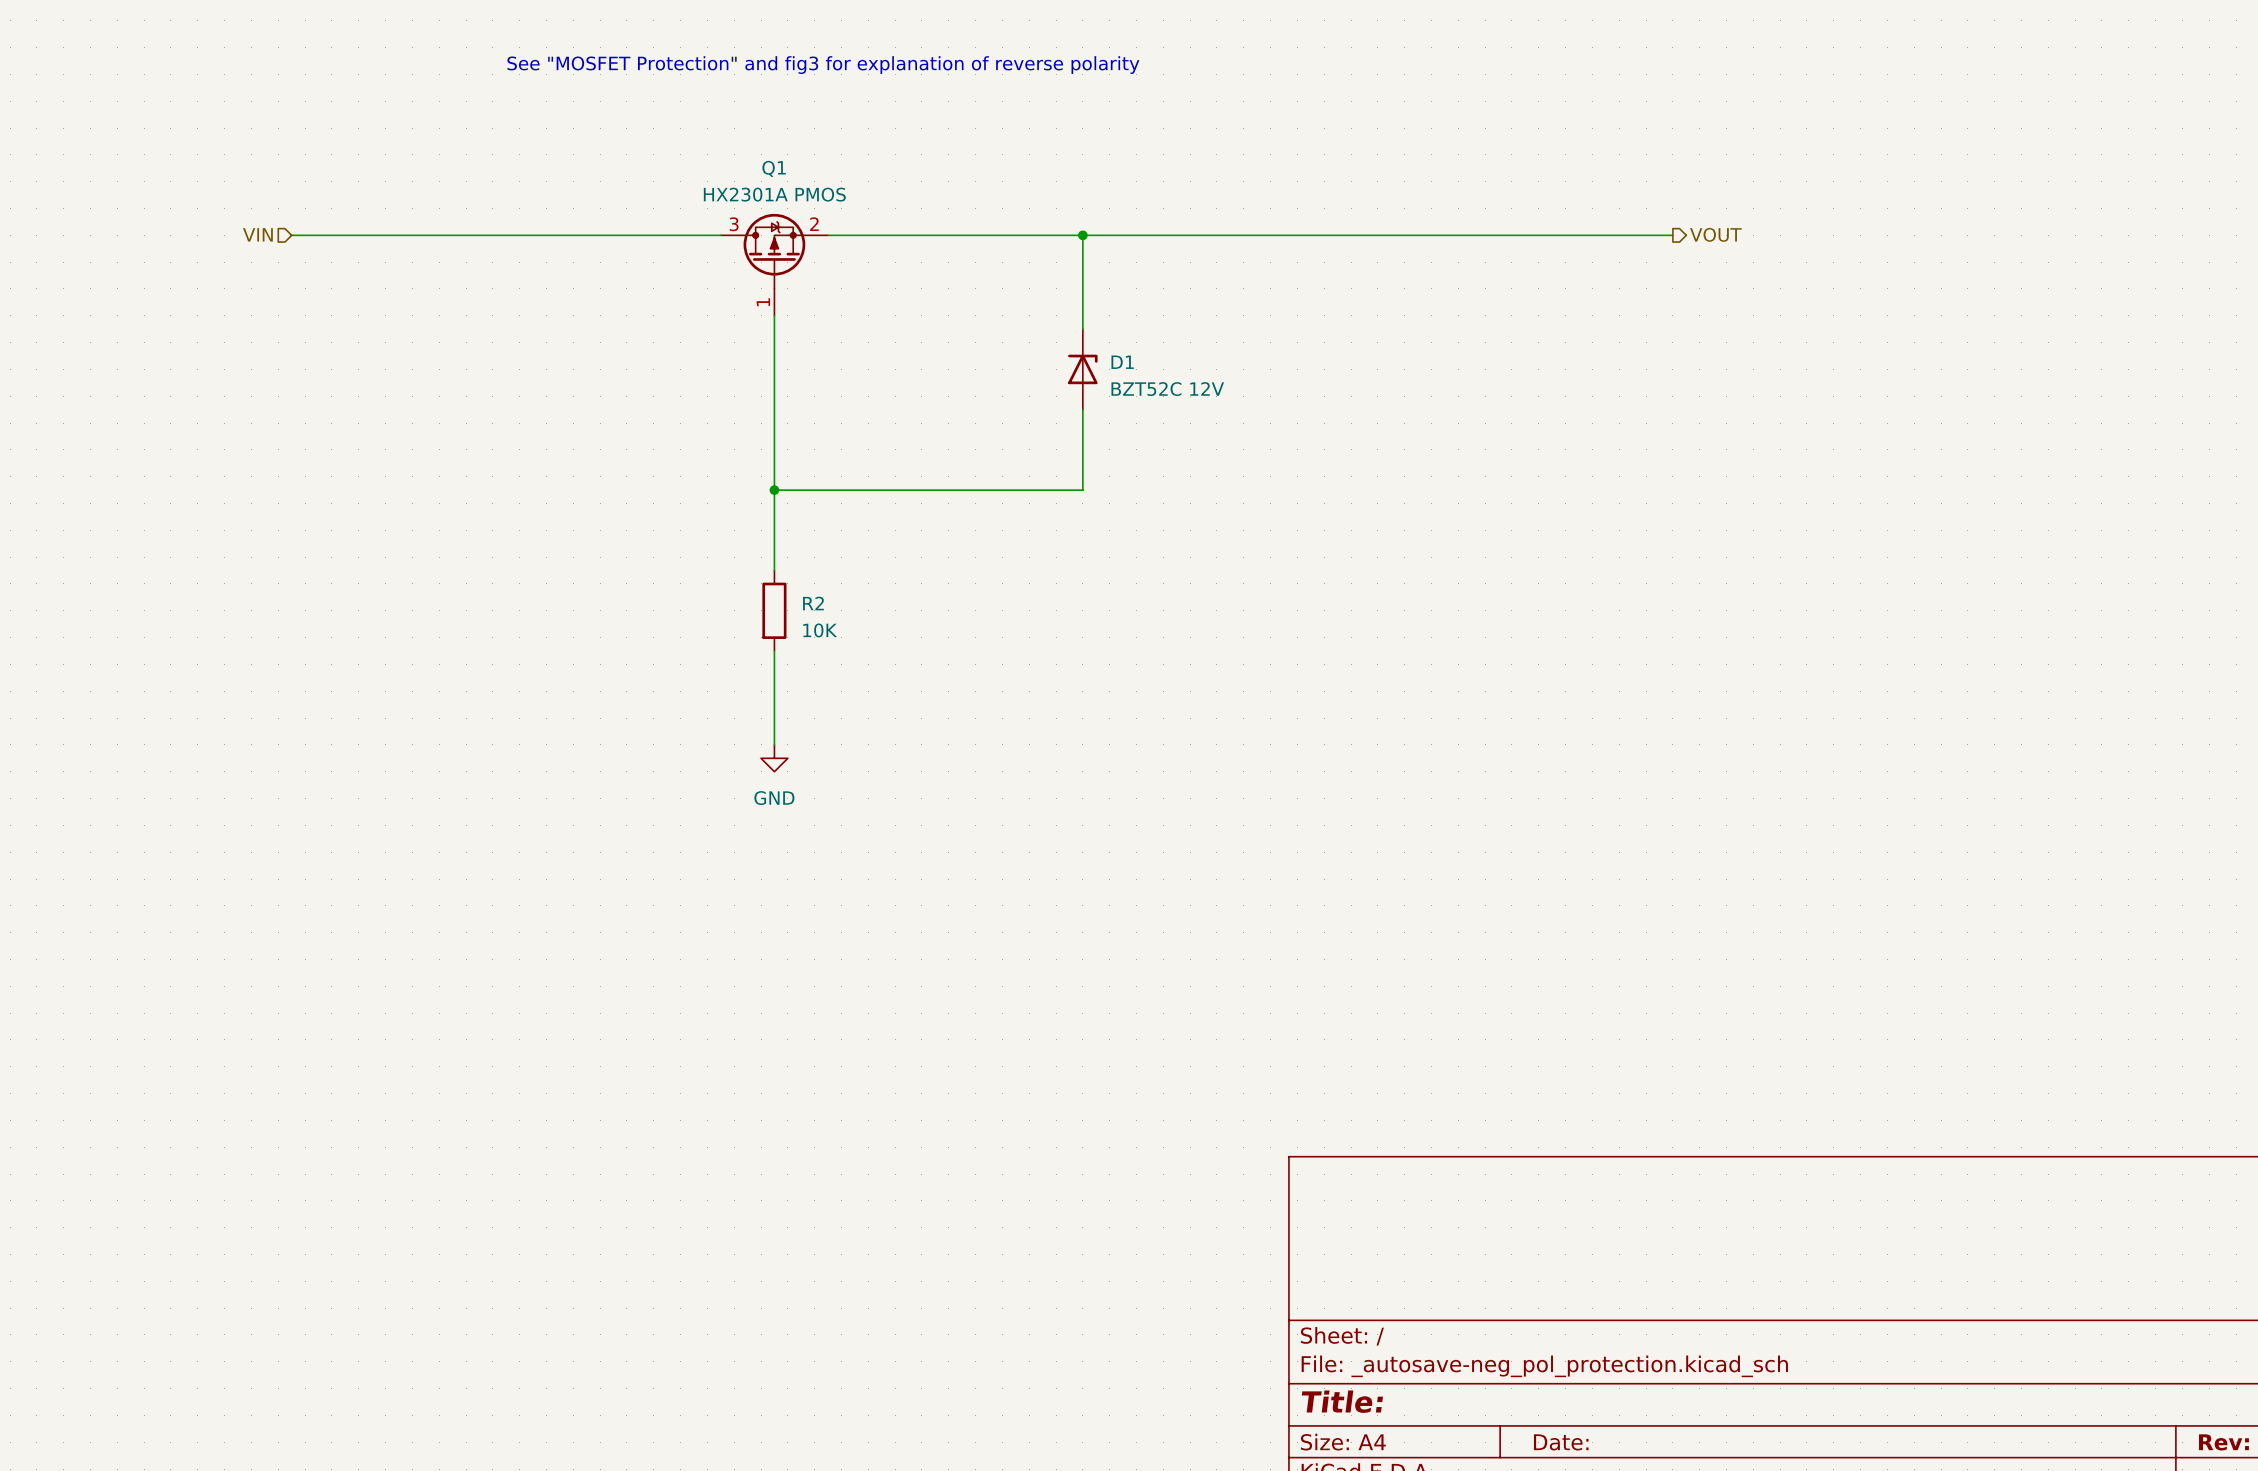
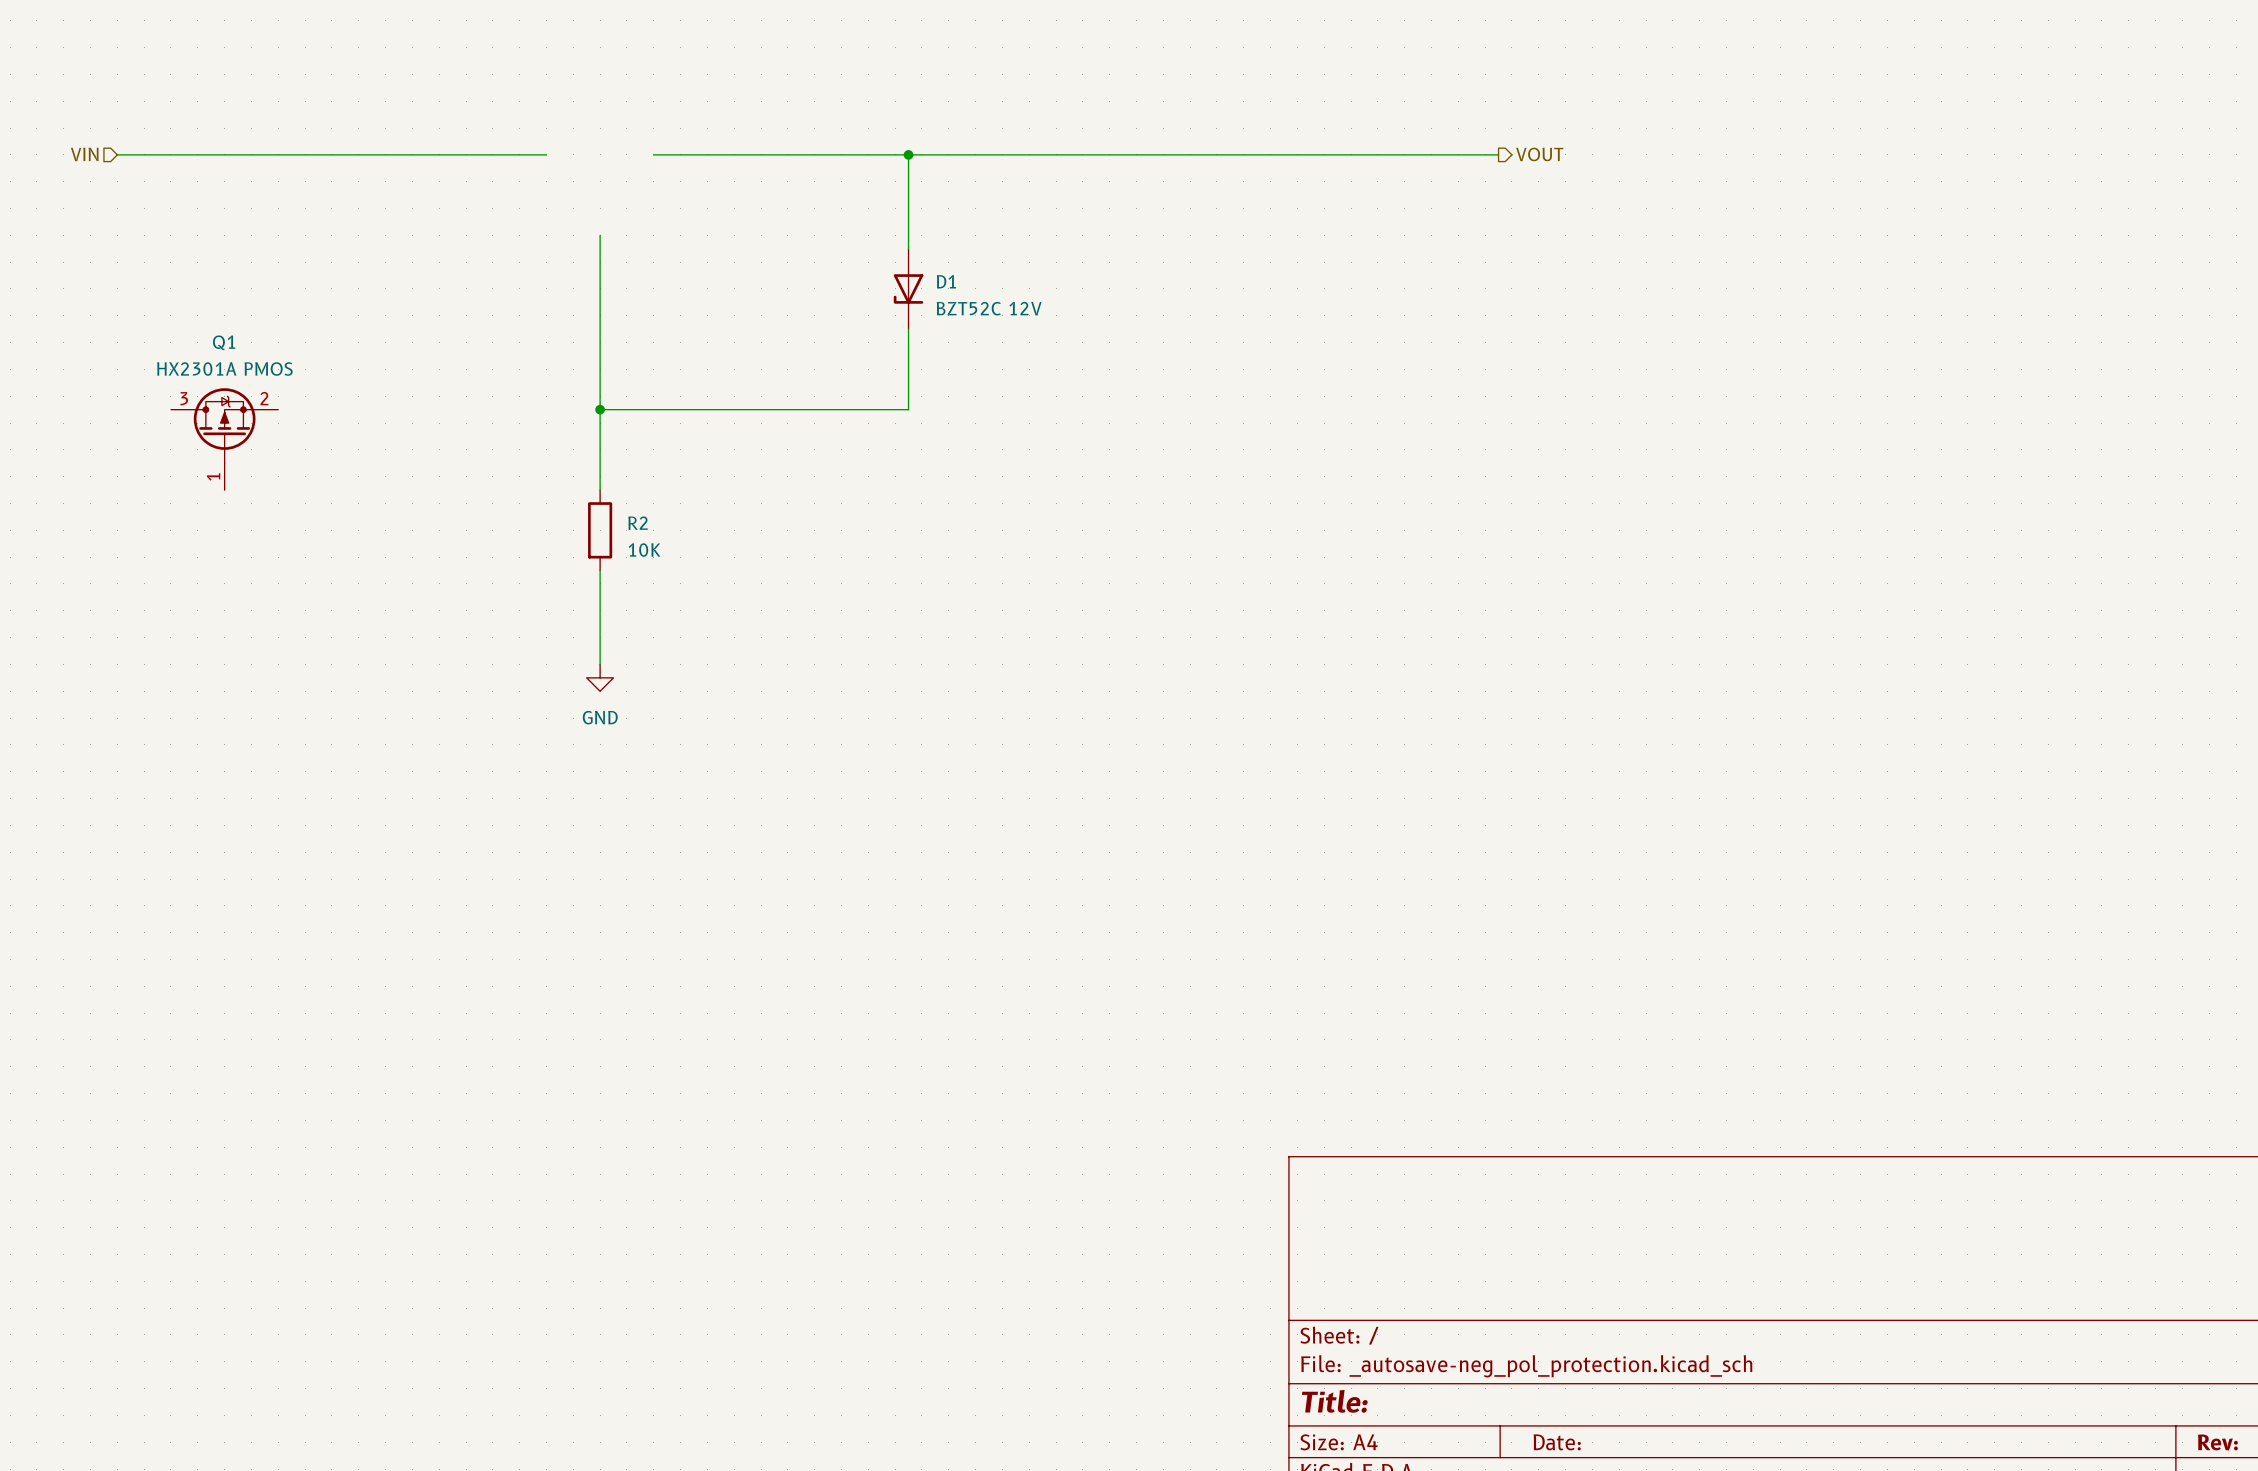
text: See "MOSFET Protection" and fig3 for explanation of reverse polarity (823, 65) -> none
junction: none -> (908, 154)
hierarchical label position: VIN (257, 234) -> VIN (84, 154)
hierarchical label position: VOUT (1715, 234) -> VOUT (1539, 154)
wire: (291, 235) (720, 235) -> (117, 154) (546, 154)
wire: (828, 235) (1672, 235) -> (653, 154) (1498, 154)
wire: (1082, 235) (1082, 329) -> (908, 154) (908, 248)
junction: (1082, 235) -> none
Q1 position: (774, 264) -> (224, 439)
wire: (774, 315) (774, 570) -> (600, 235) (600, 490)
D1 rotation: 0° (1082, 369) -> 180° (908, 288)
D1 position: (1082, 369) -> (908, 288)
junction: none -> (600, 409)
wire: (1082, 409) (1082, 490) (774, 490) -> (908, 329) (908, 409) (600, 409)
junction: (774, 490) -> none
R2 position: (774, 610) -> (600, 530)
wire: (774, 651) (774, 744) -> (600, 570) (600, 664)
power symbol position: GND (774, 758) -> GND (600, 677)

